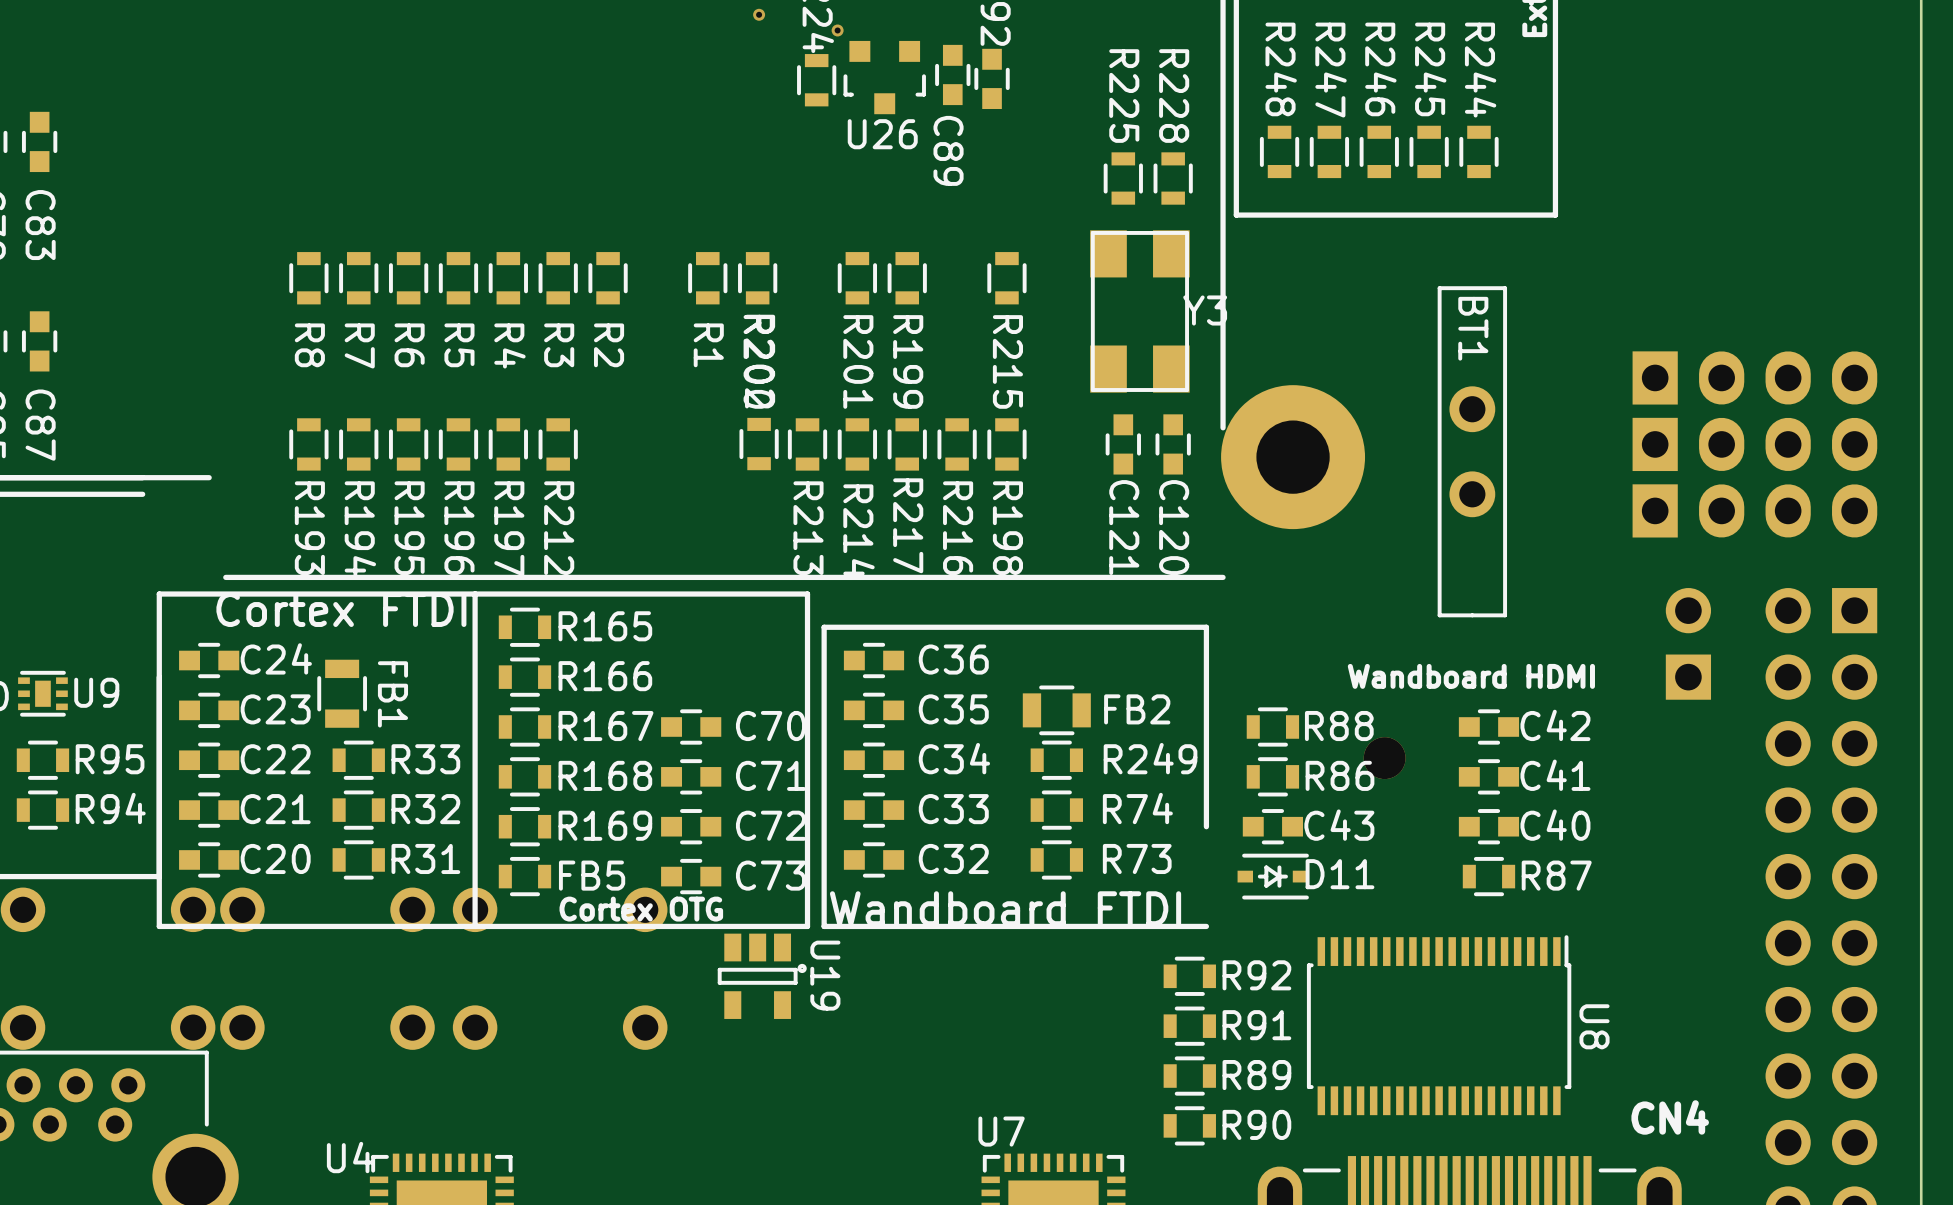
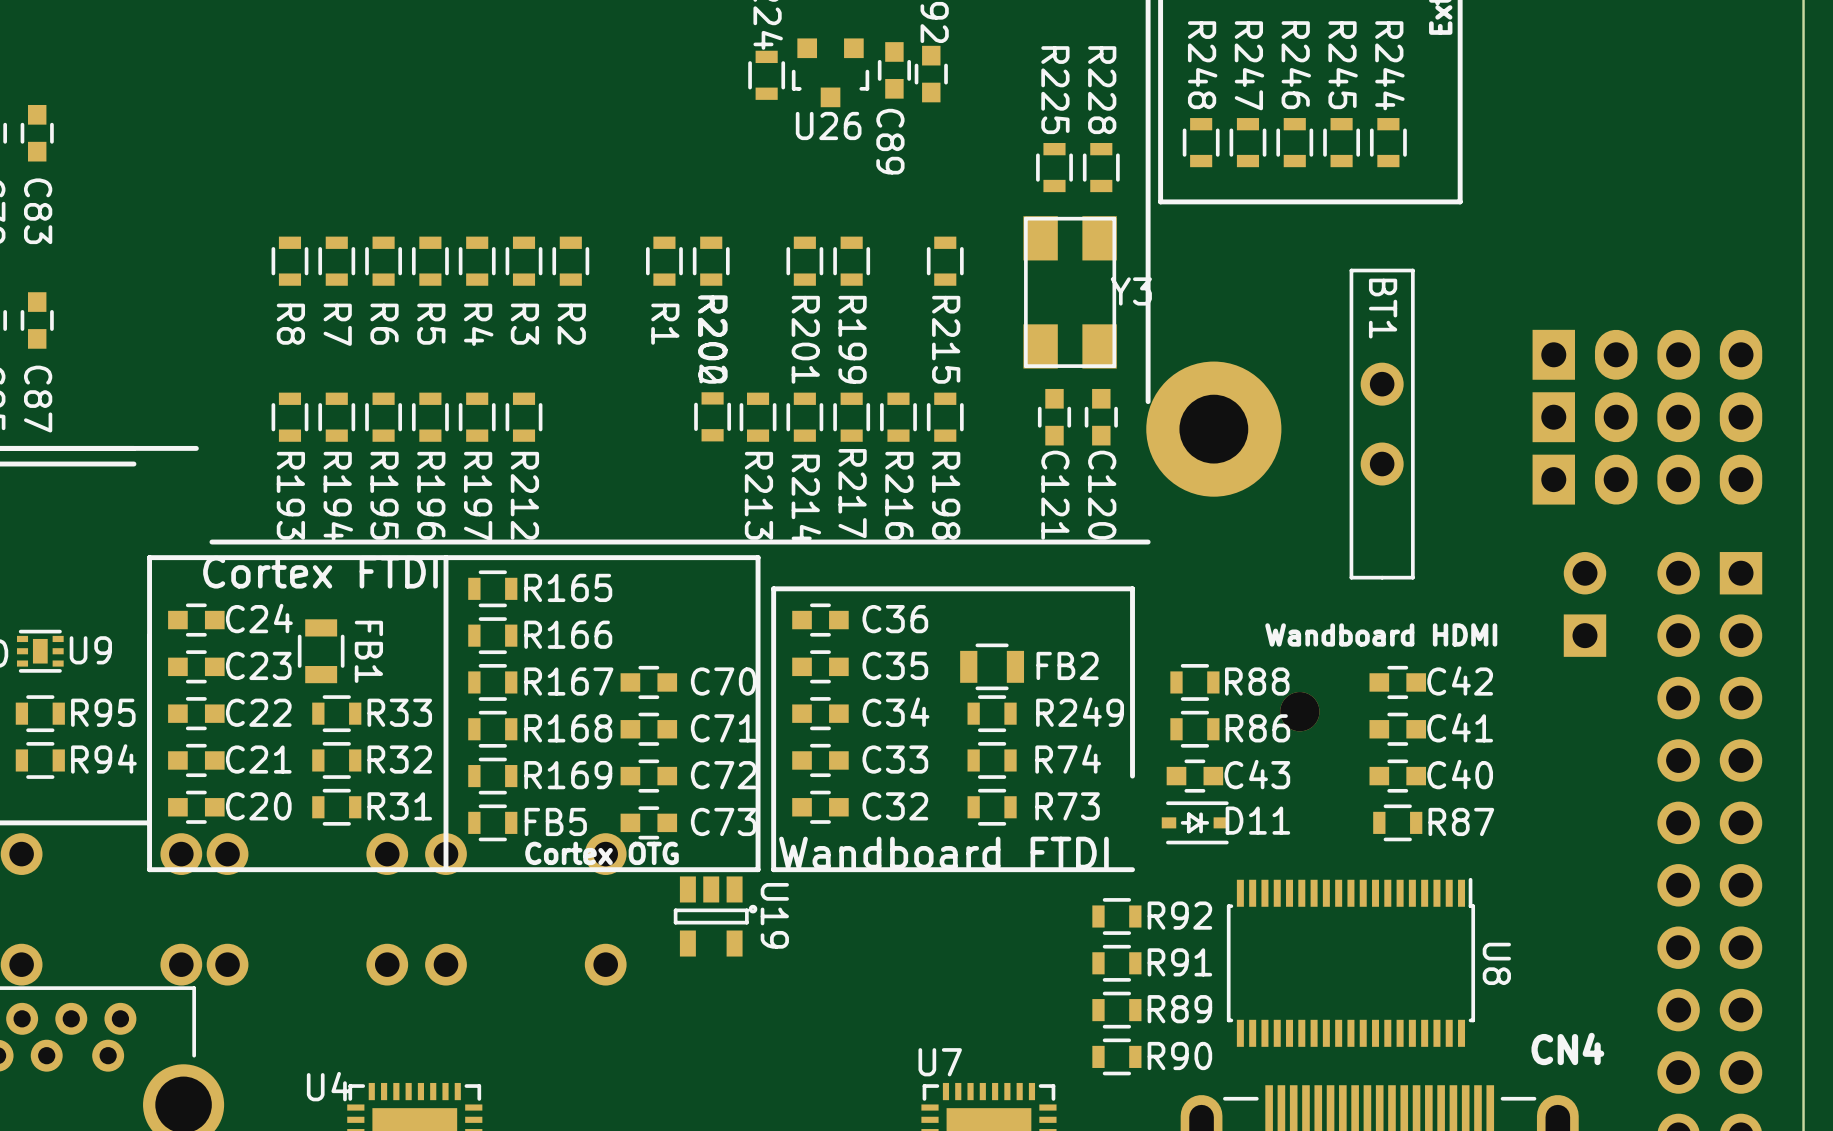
via: (759, 14) -> none
via: (837, 30) -> none

